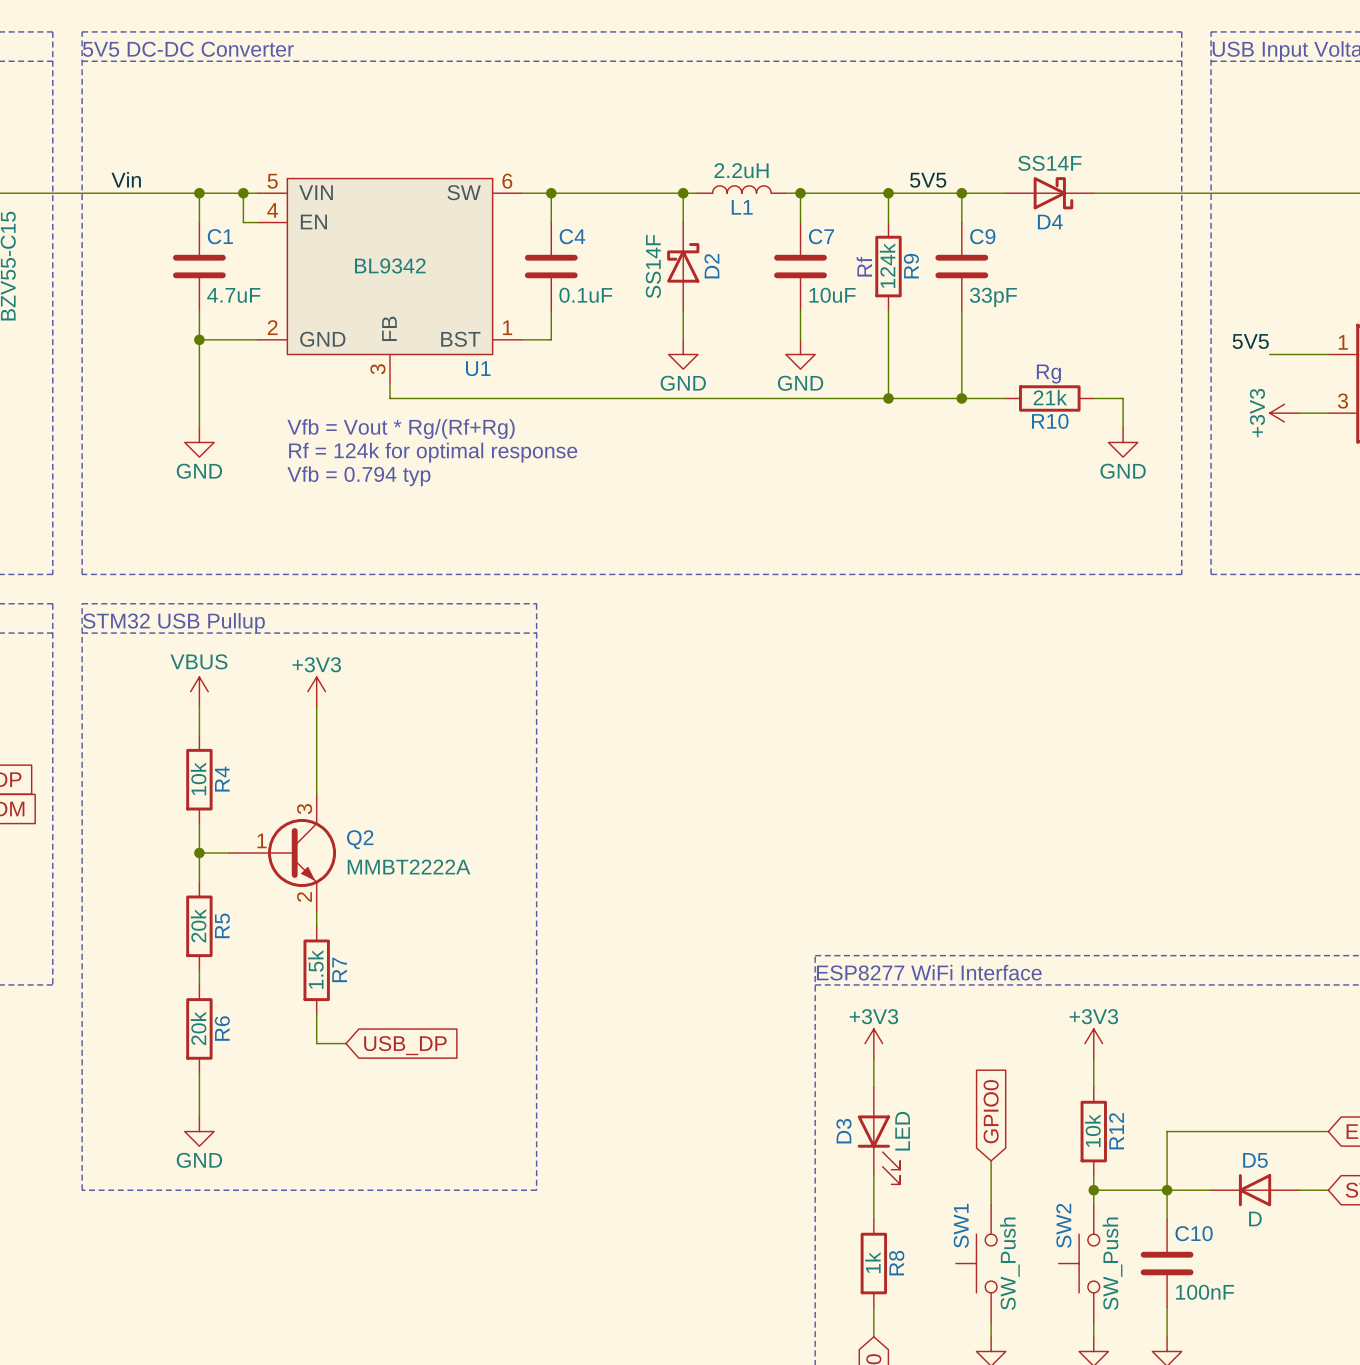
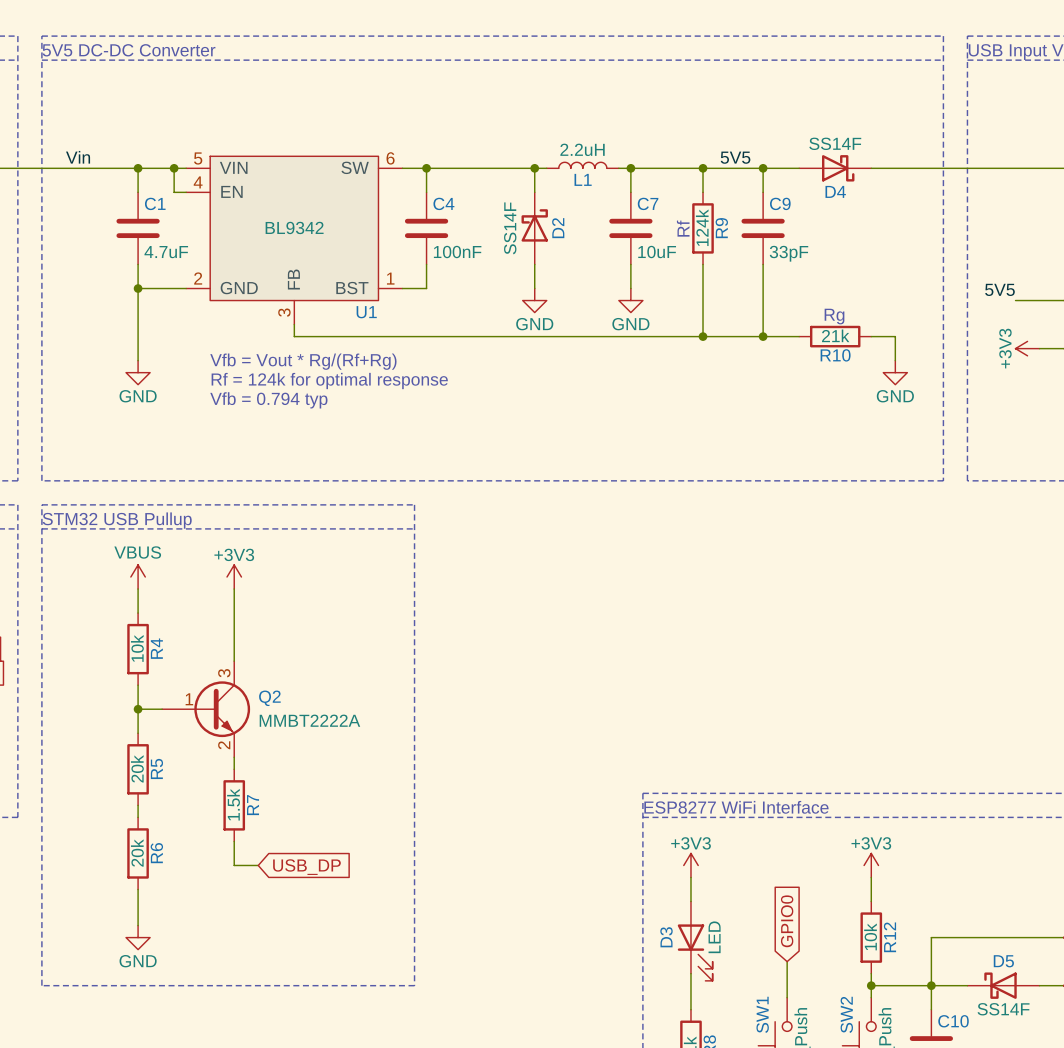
C4 value: 0.1uF (585, 295) -> 100nF (457, 252)
D5 symbol: [1211, 1174, 1300, 1207] -> [967, 972, 1040, 999]
D5 value: D (1255, 1218) -> SS14F (1003, 1009)

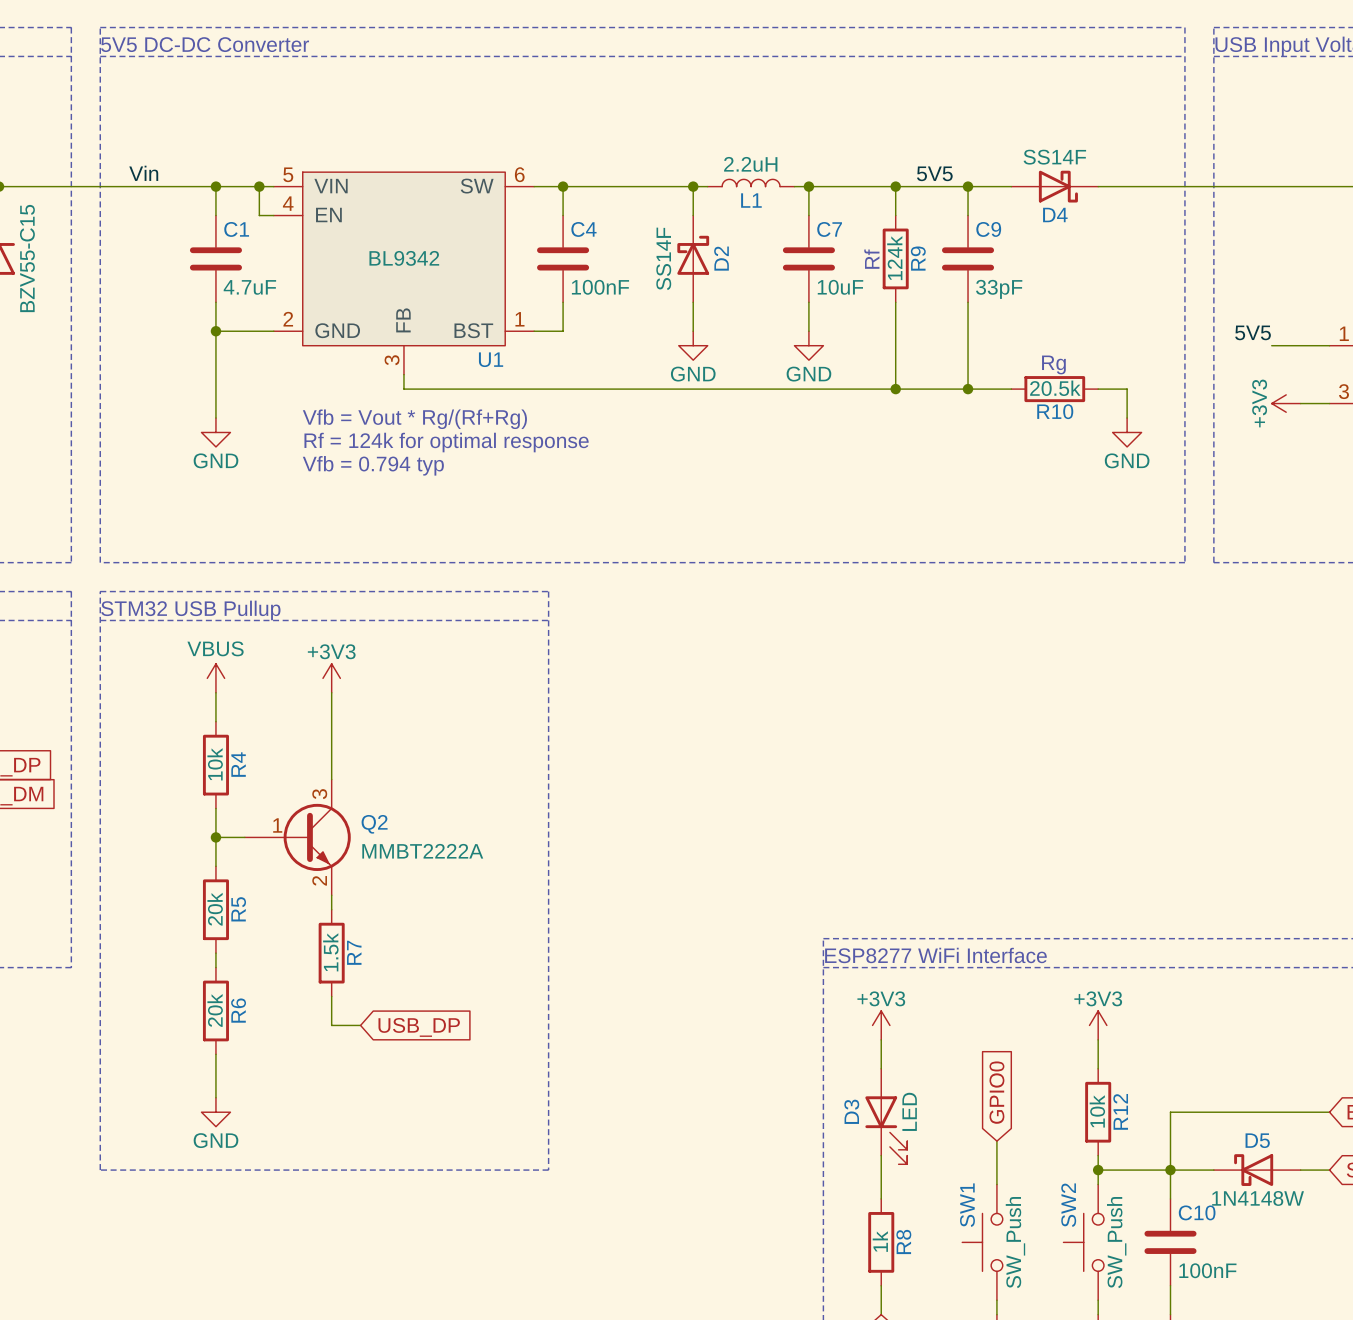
R10 value: 21k (835, 335) -> 20.5k (1055, 388)
D5 value: SS14F (1003, 1009) -> 1N4148W (1258, 1198)

